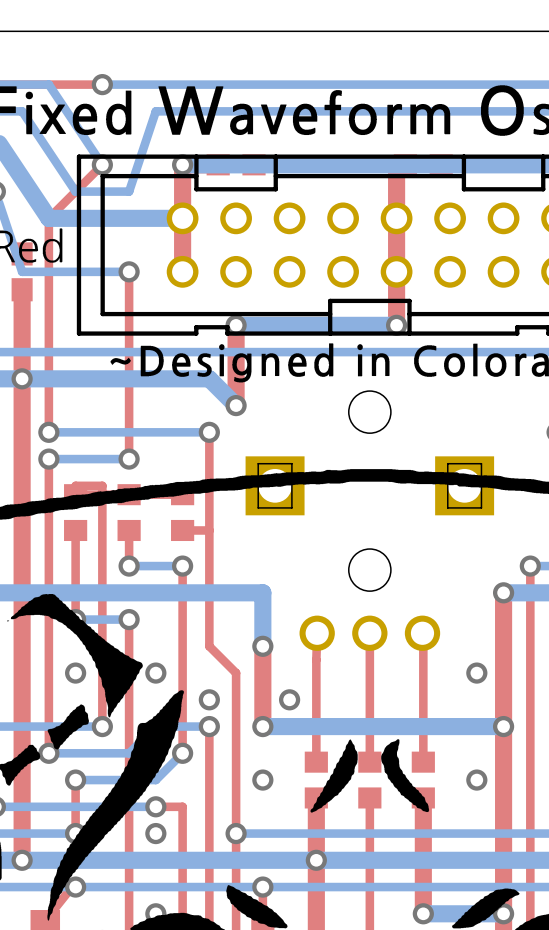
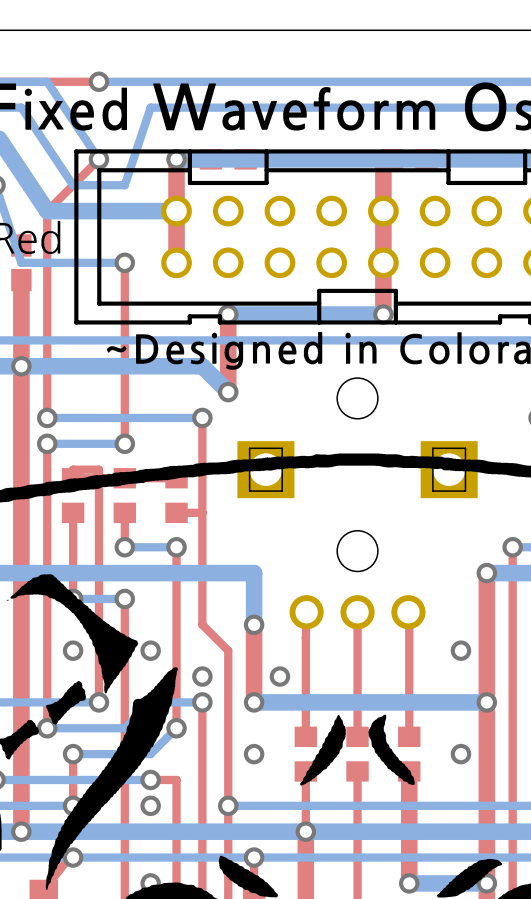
top track width: thick (316, 797) (316, 860) -> thin (305, 771) (305, 831)

